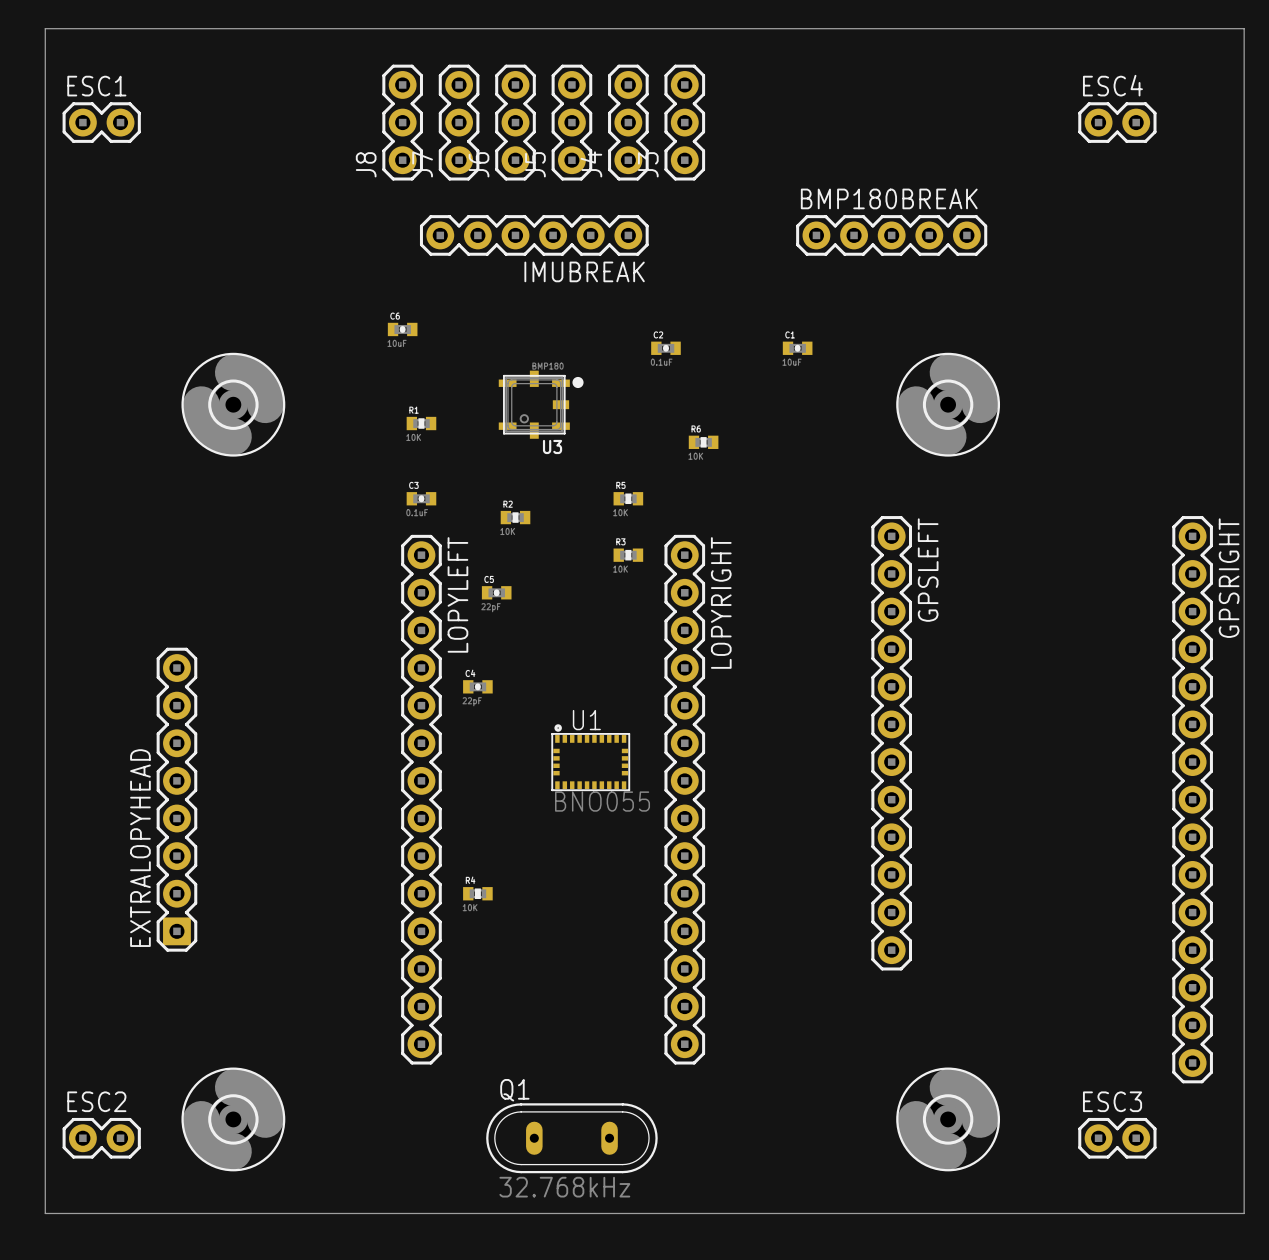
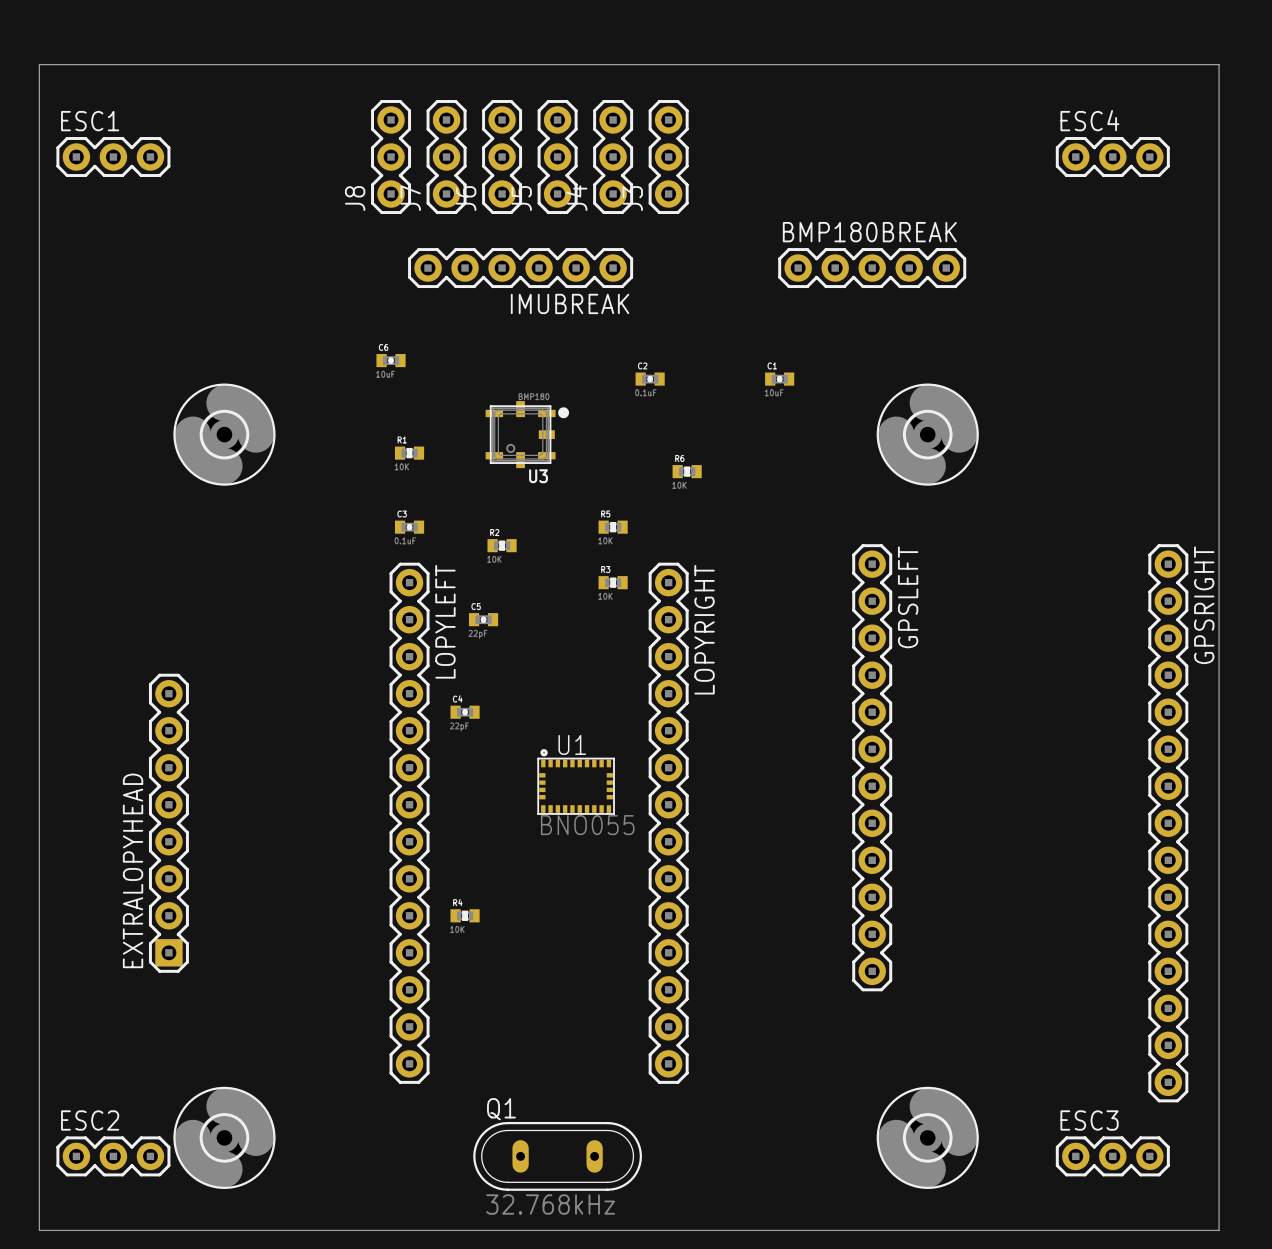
ESC1 footprint: [62, 102, 141, 143] -> [56, 137, 171, 177]
ESC4 footprint: [1078, 102, 1157, 143] -> [1055, 137, 1170, 177]
ESC2 footprint: [62, 1117, 141, 1159] -> [56, 1136, 171, 1177]
ESC3 footprint: [1078, 1117, 1157, 1159] -> [1055, 1136, 1170, 1177]

